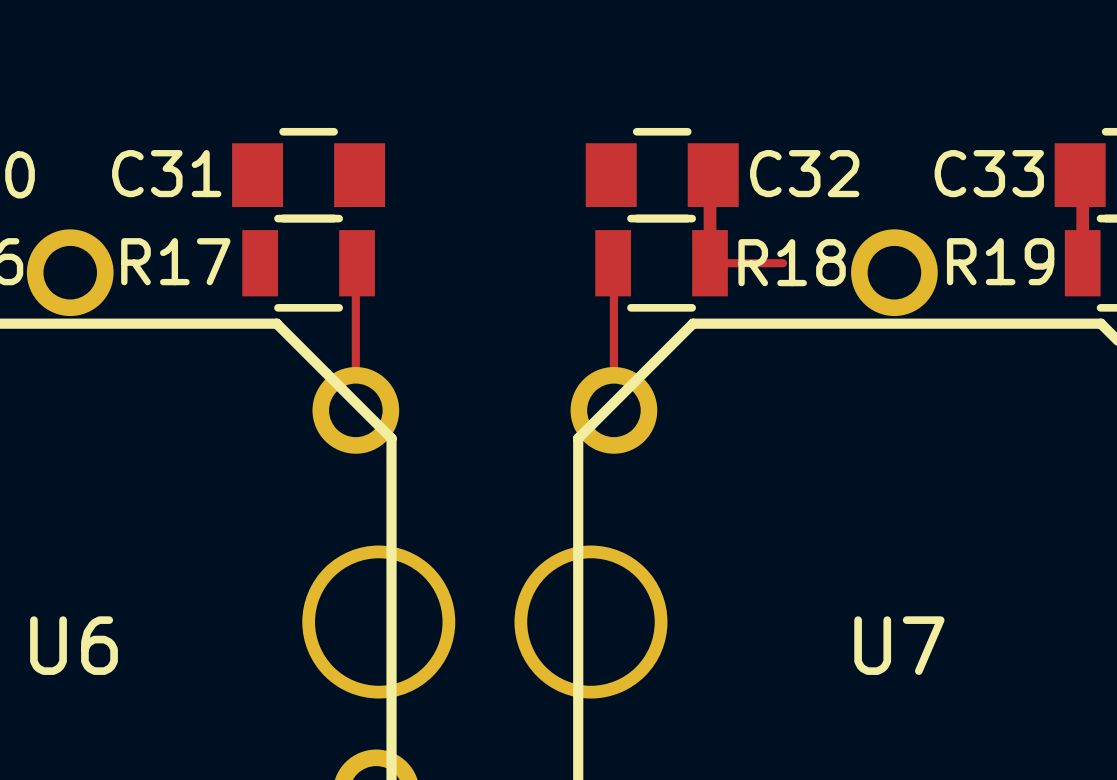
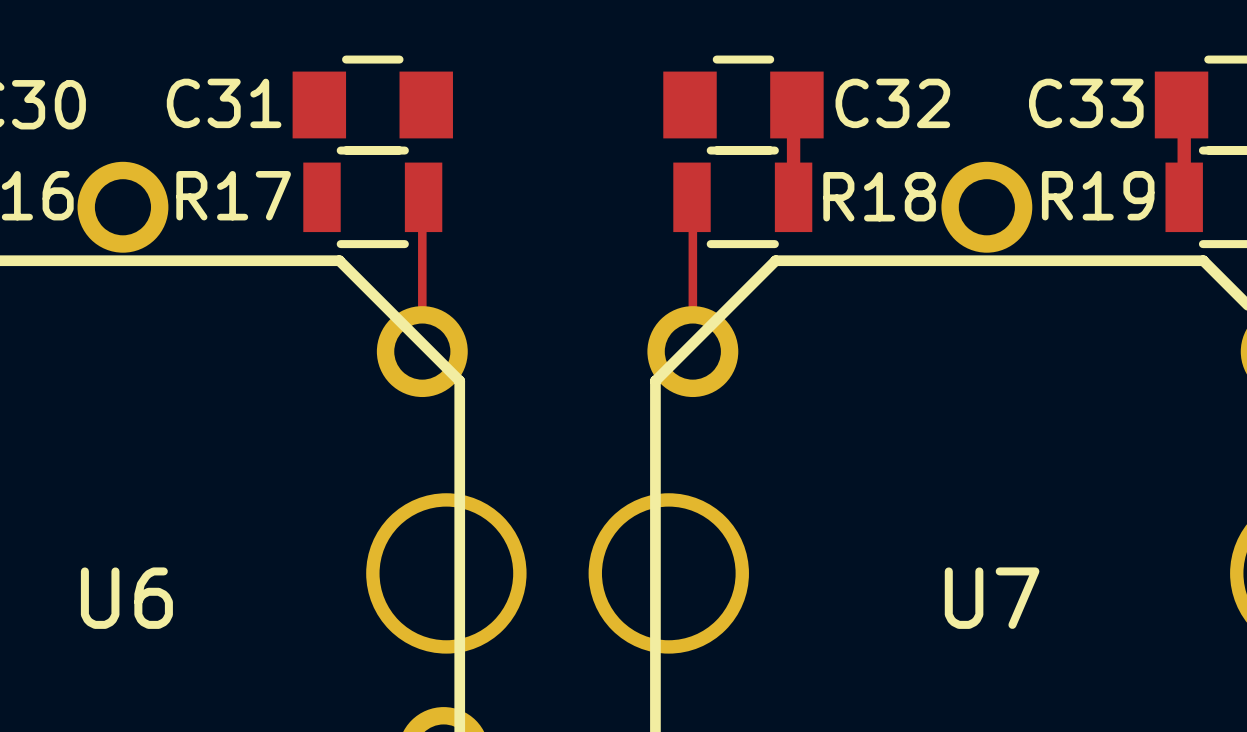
track: (710, 263) (783, 263) -> none

